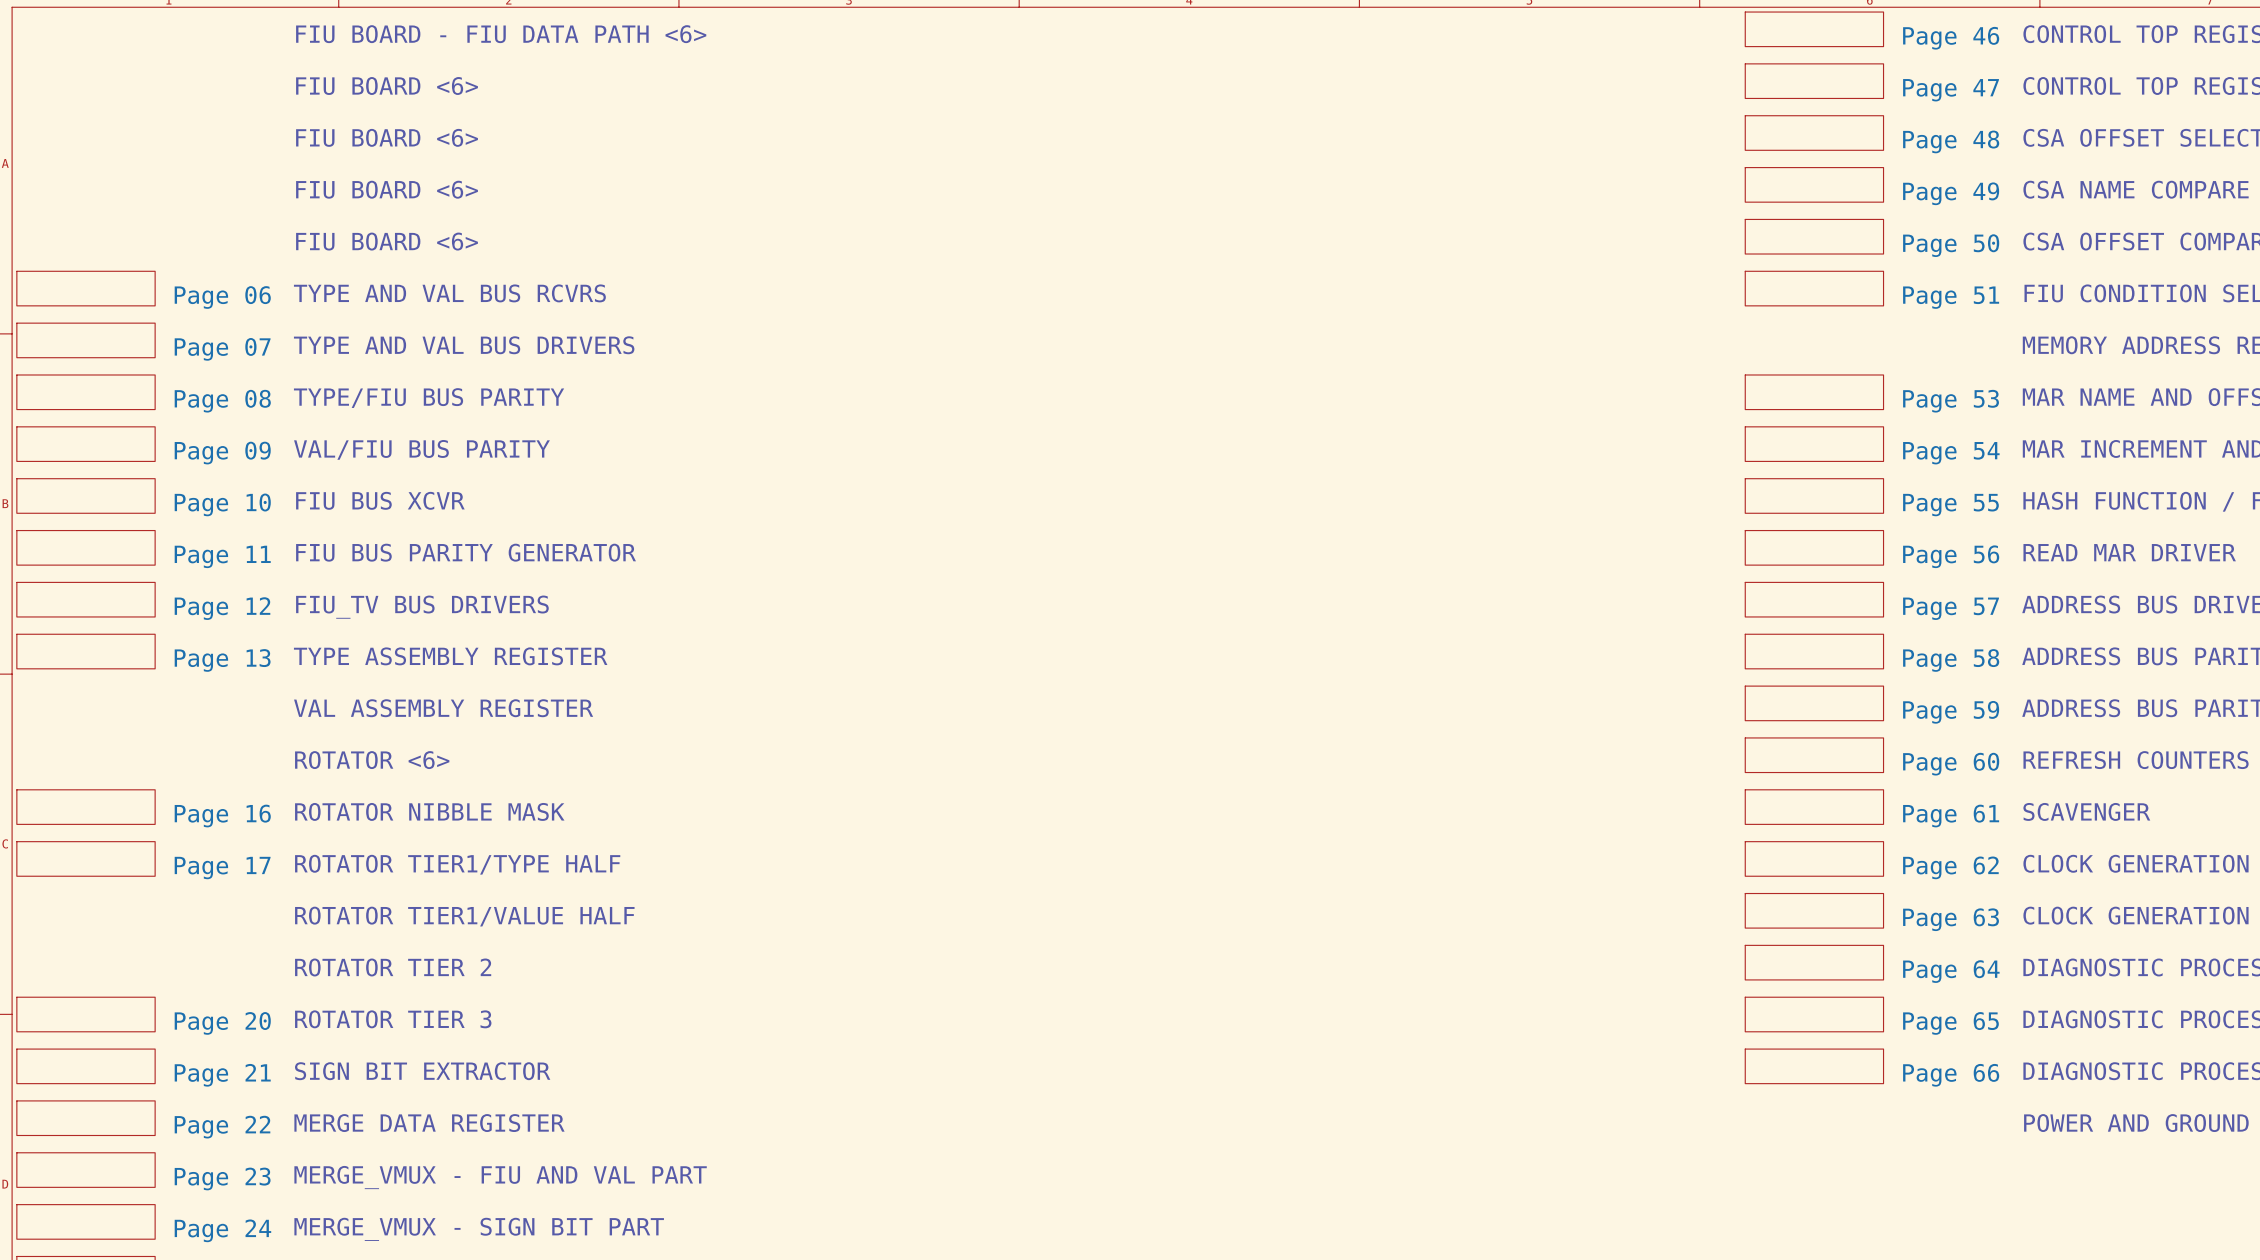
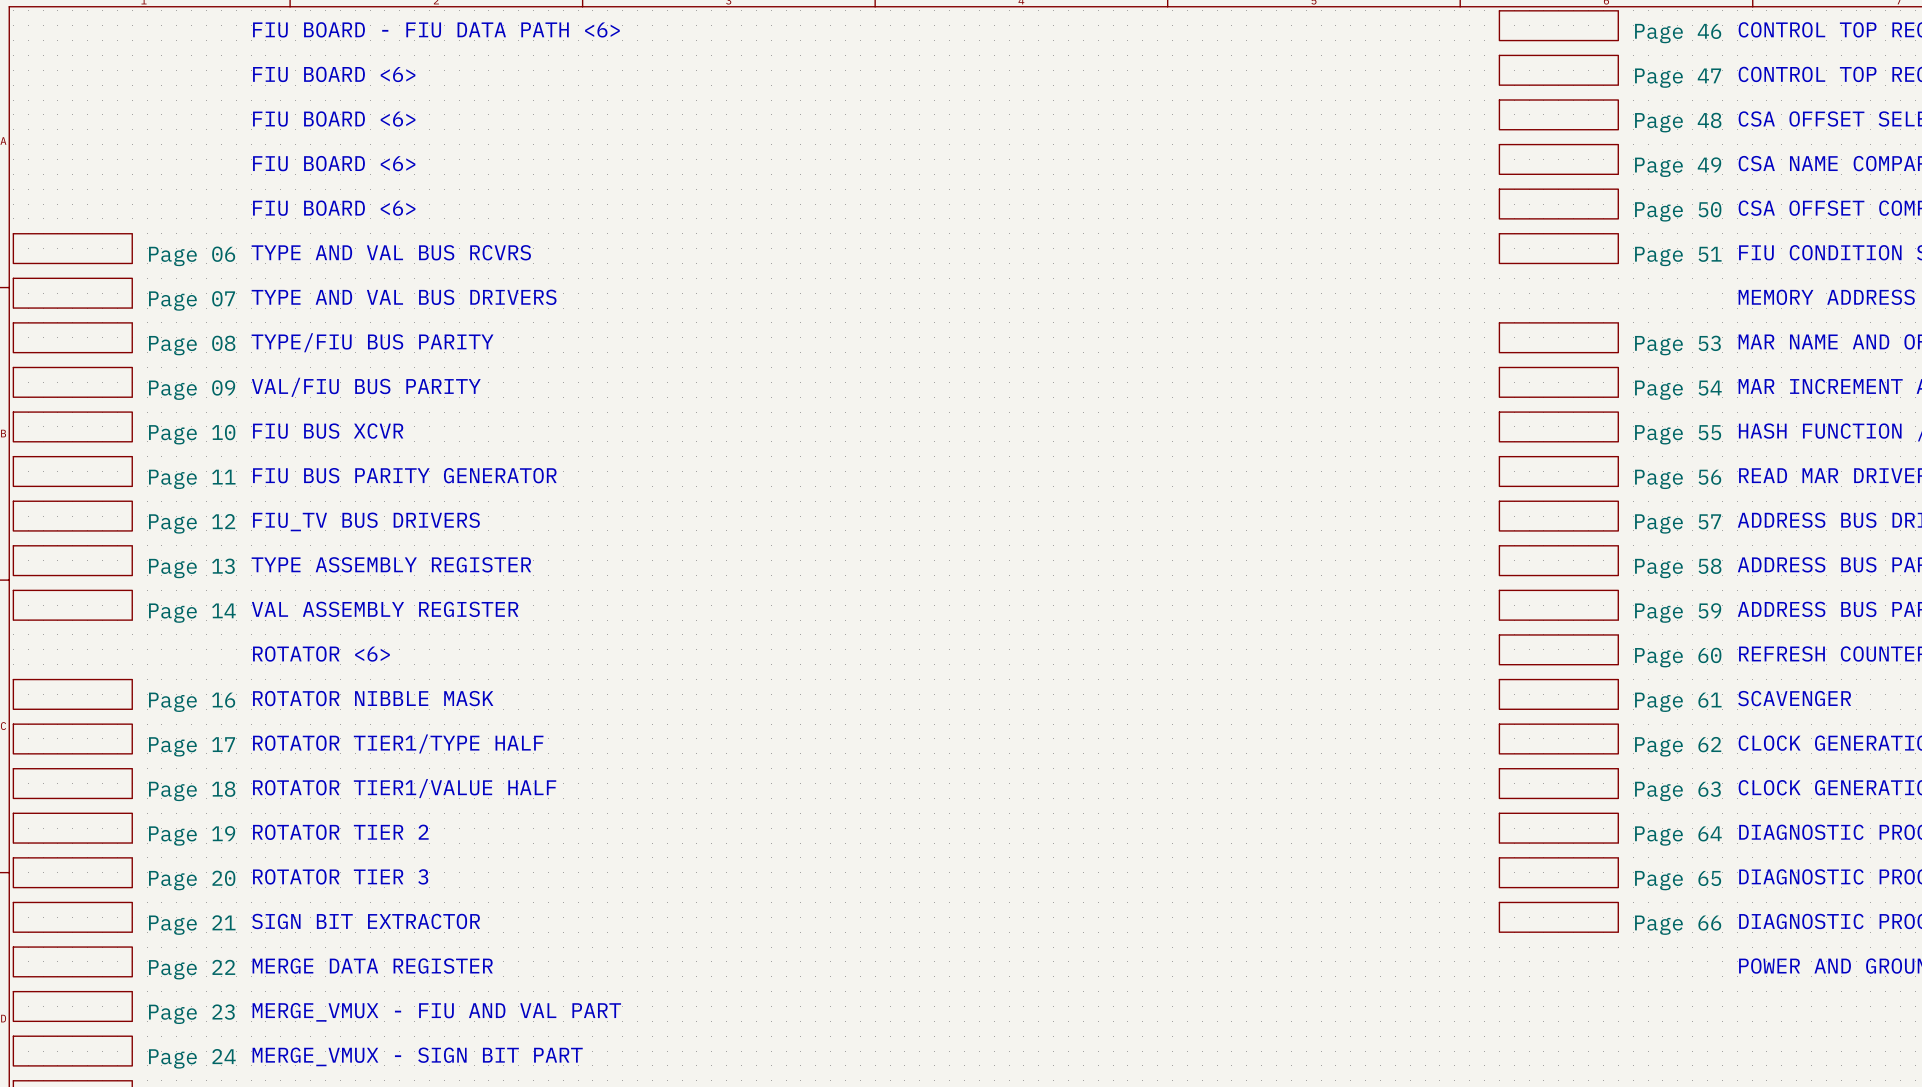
sheet Page 14: none -> (72, 605)
sheet Page 18: none -> (72, 783)
sheet Page 19: none -> (72, 828)

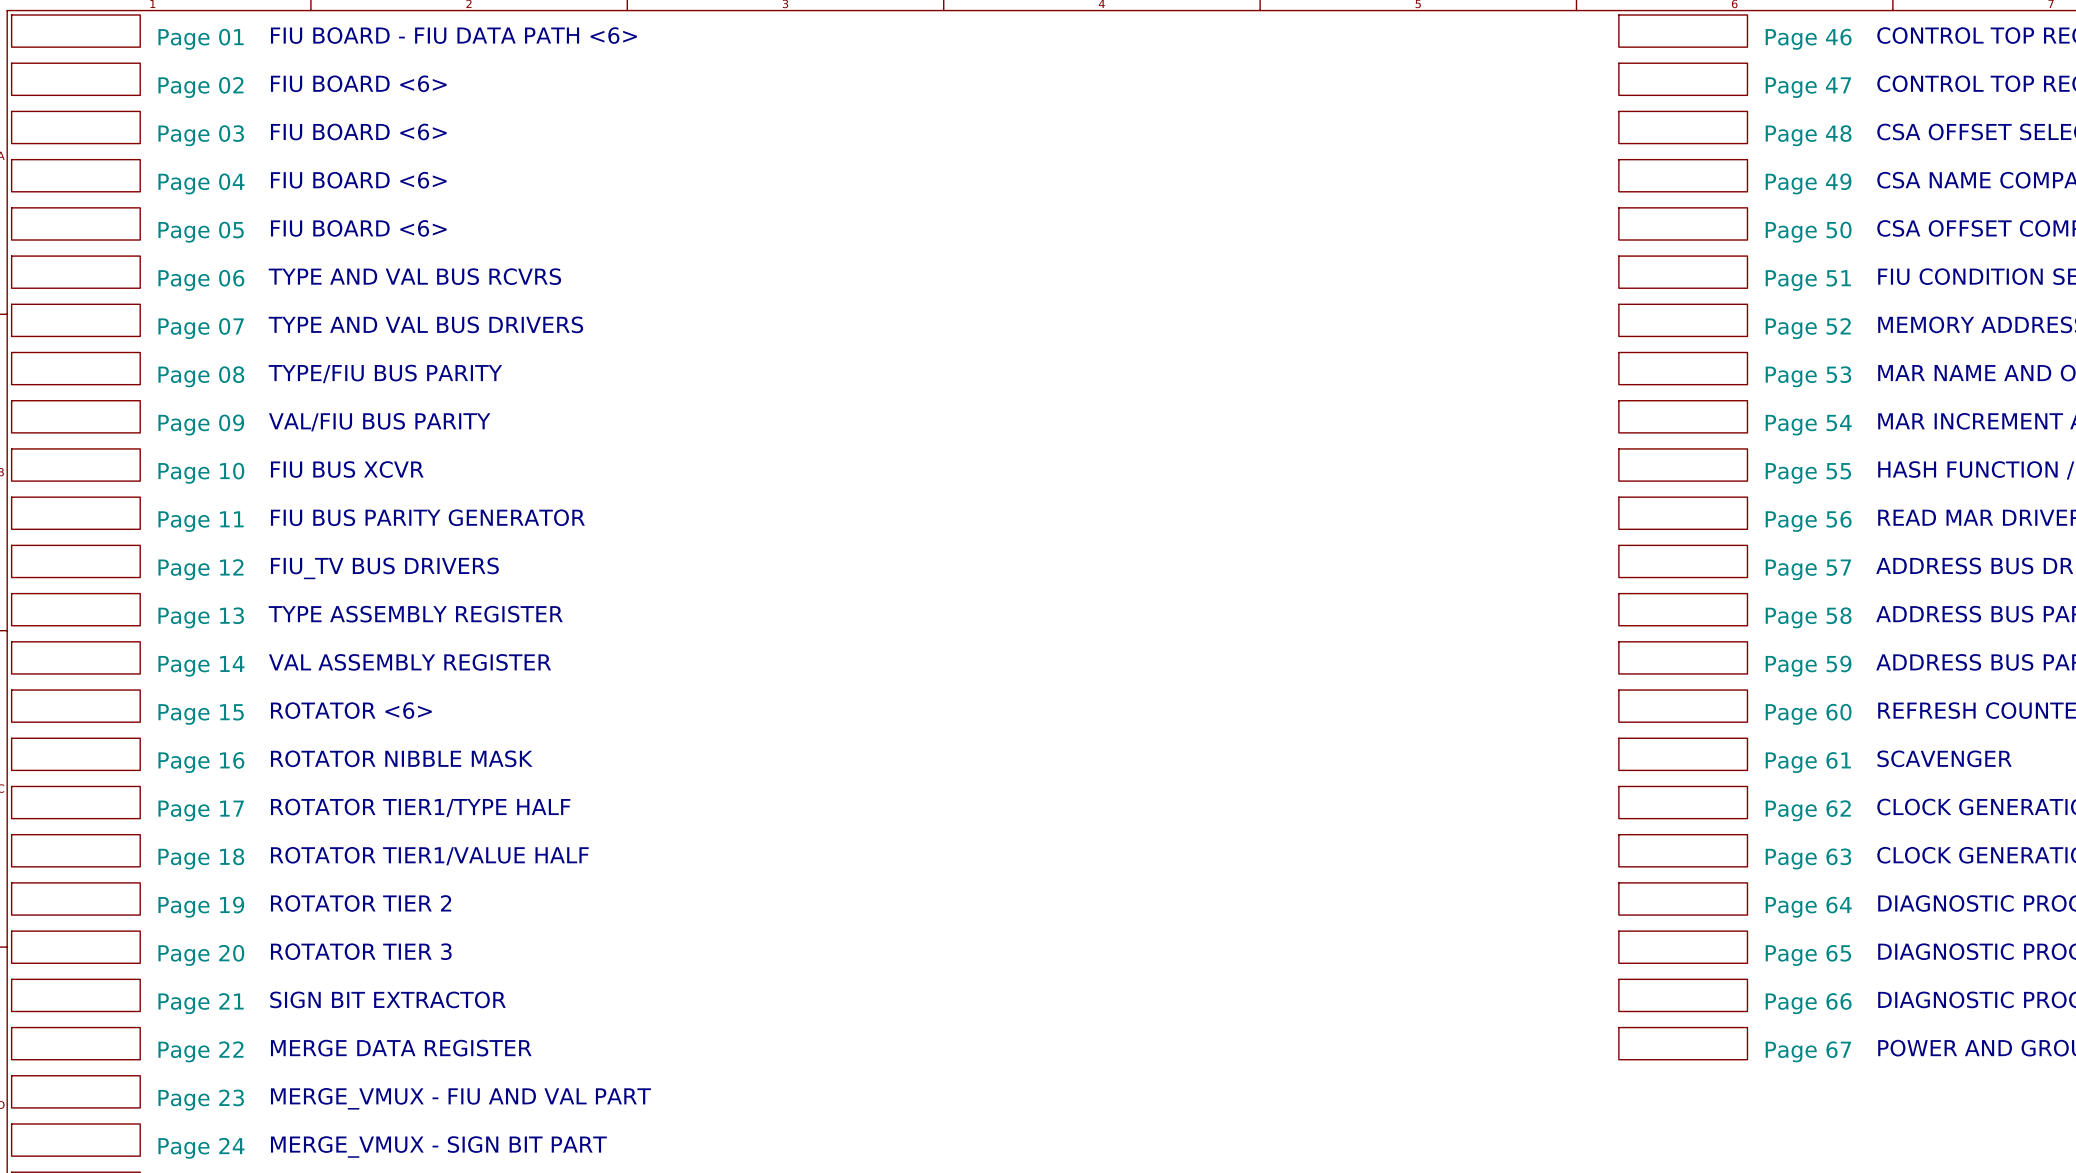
sheet Page 01: none -> (75, 31)
sheet Page 02: none -> (75, 79)
sheet Page 03: none -> (75, 127)
sheet Page 04: none -> (75, 175)
sheet Page 05: none -> (75, 223)
sheet Page 52: none -> (1683, 320)
sheet Page 15: none -> (75, 706)
sheet Page 67: none -> (1683, 1043)

